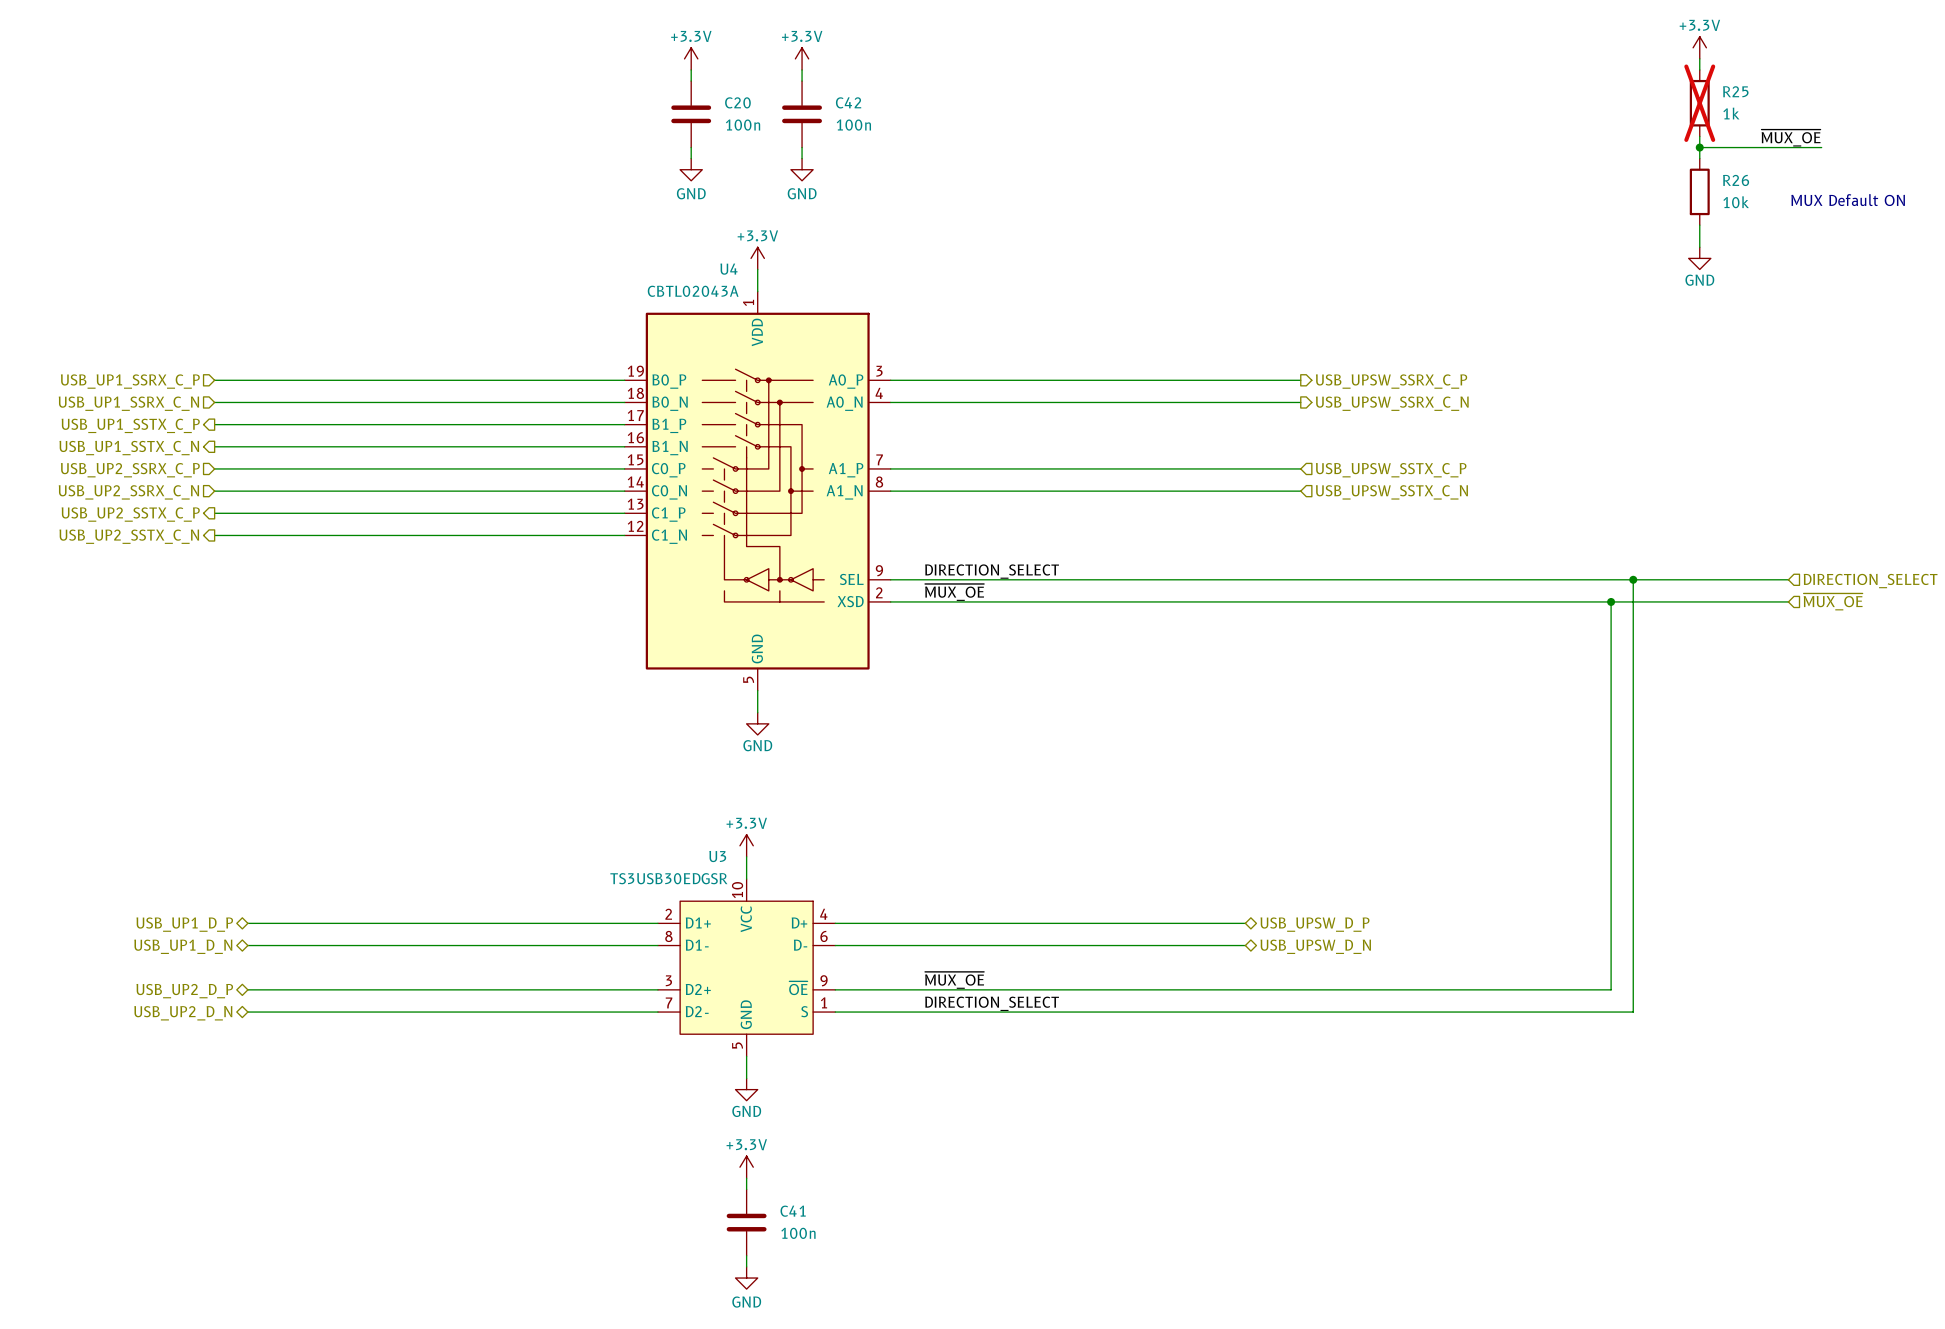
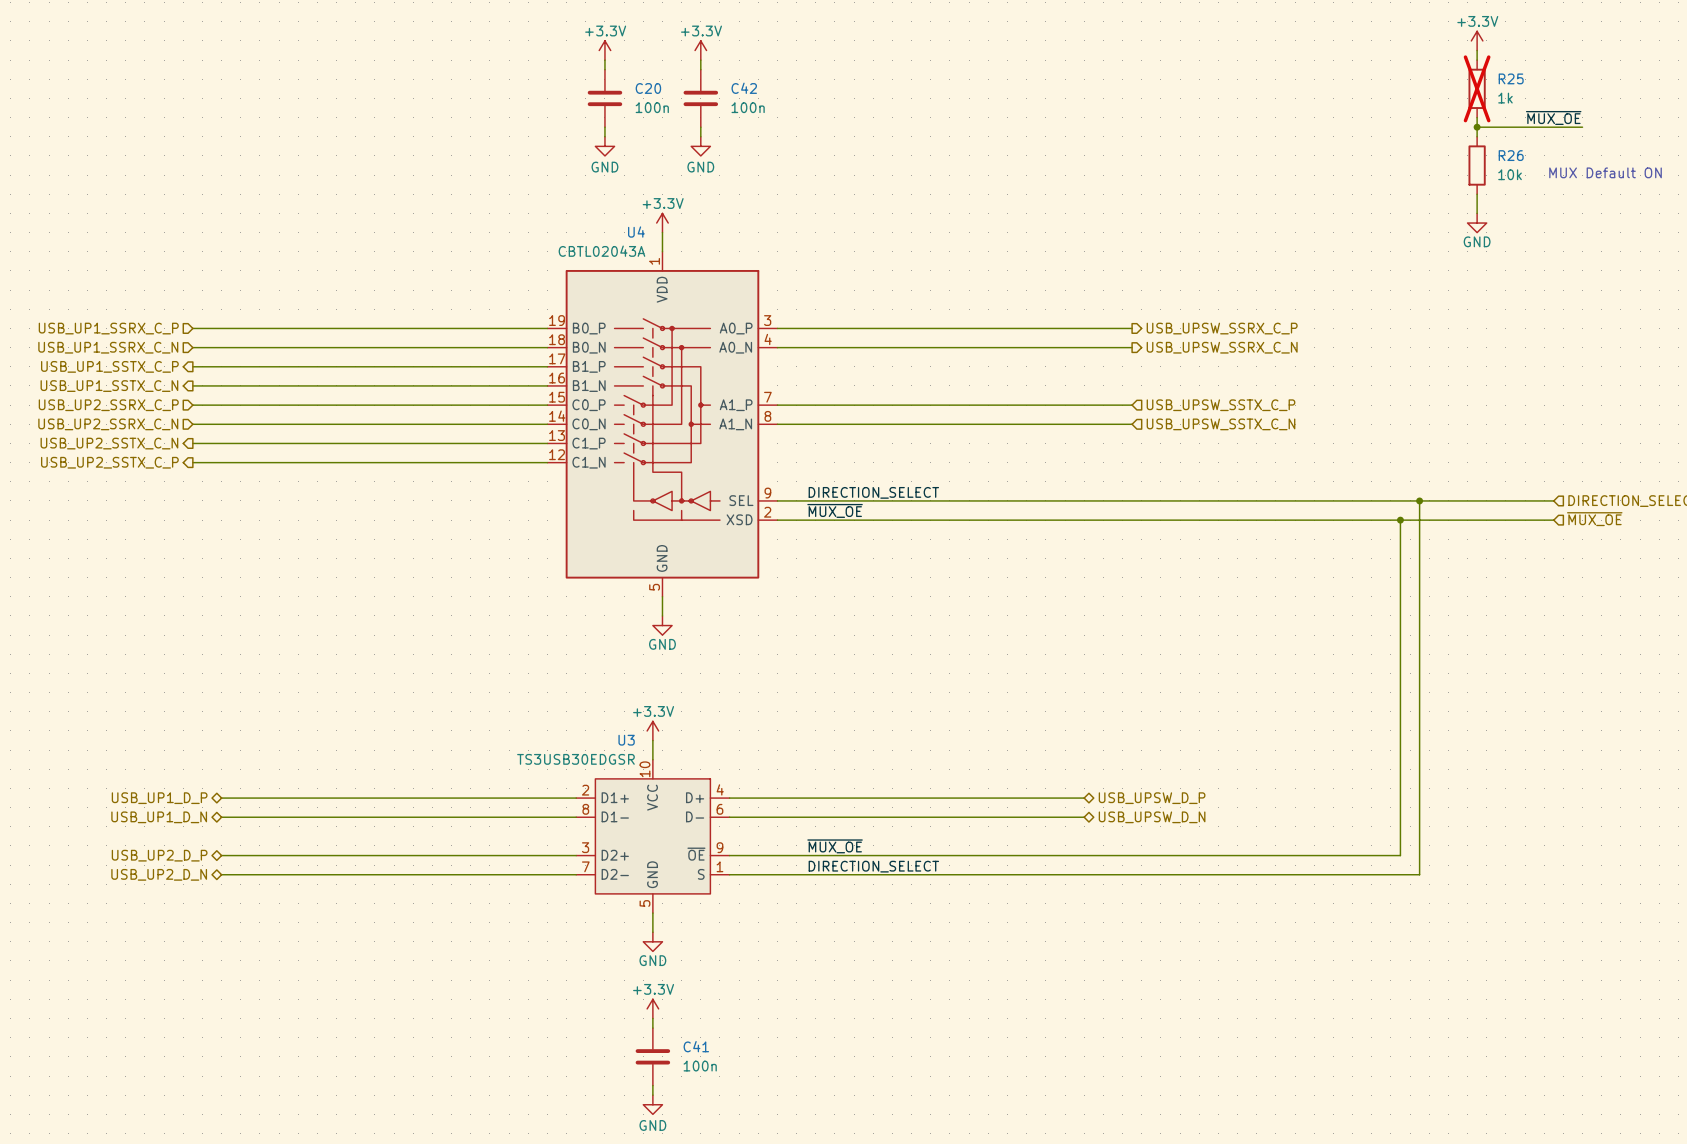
hierarchical label: USB_UP2_SSTX_C_P (130, 514) -> USB_UP2_SSTX_C_N (109, 443)
hierarchical label: USB_UP2_SSTX_C_N (129, 536) -> USB_UP2_SSTX_C_P (109, 462)

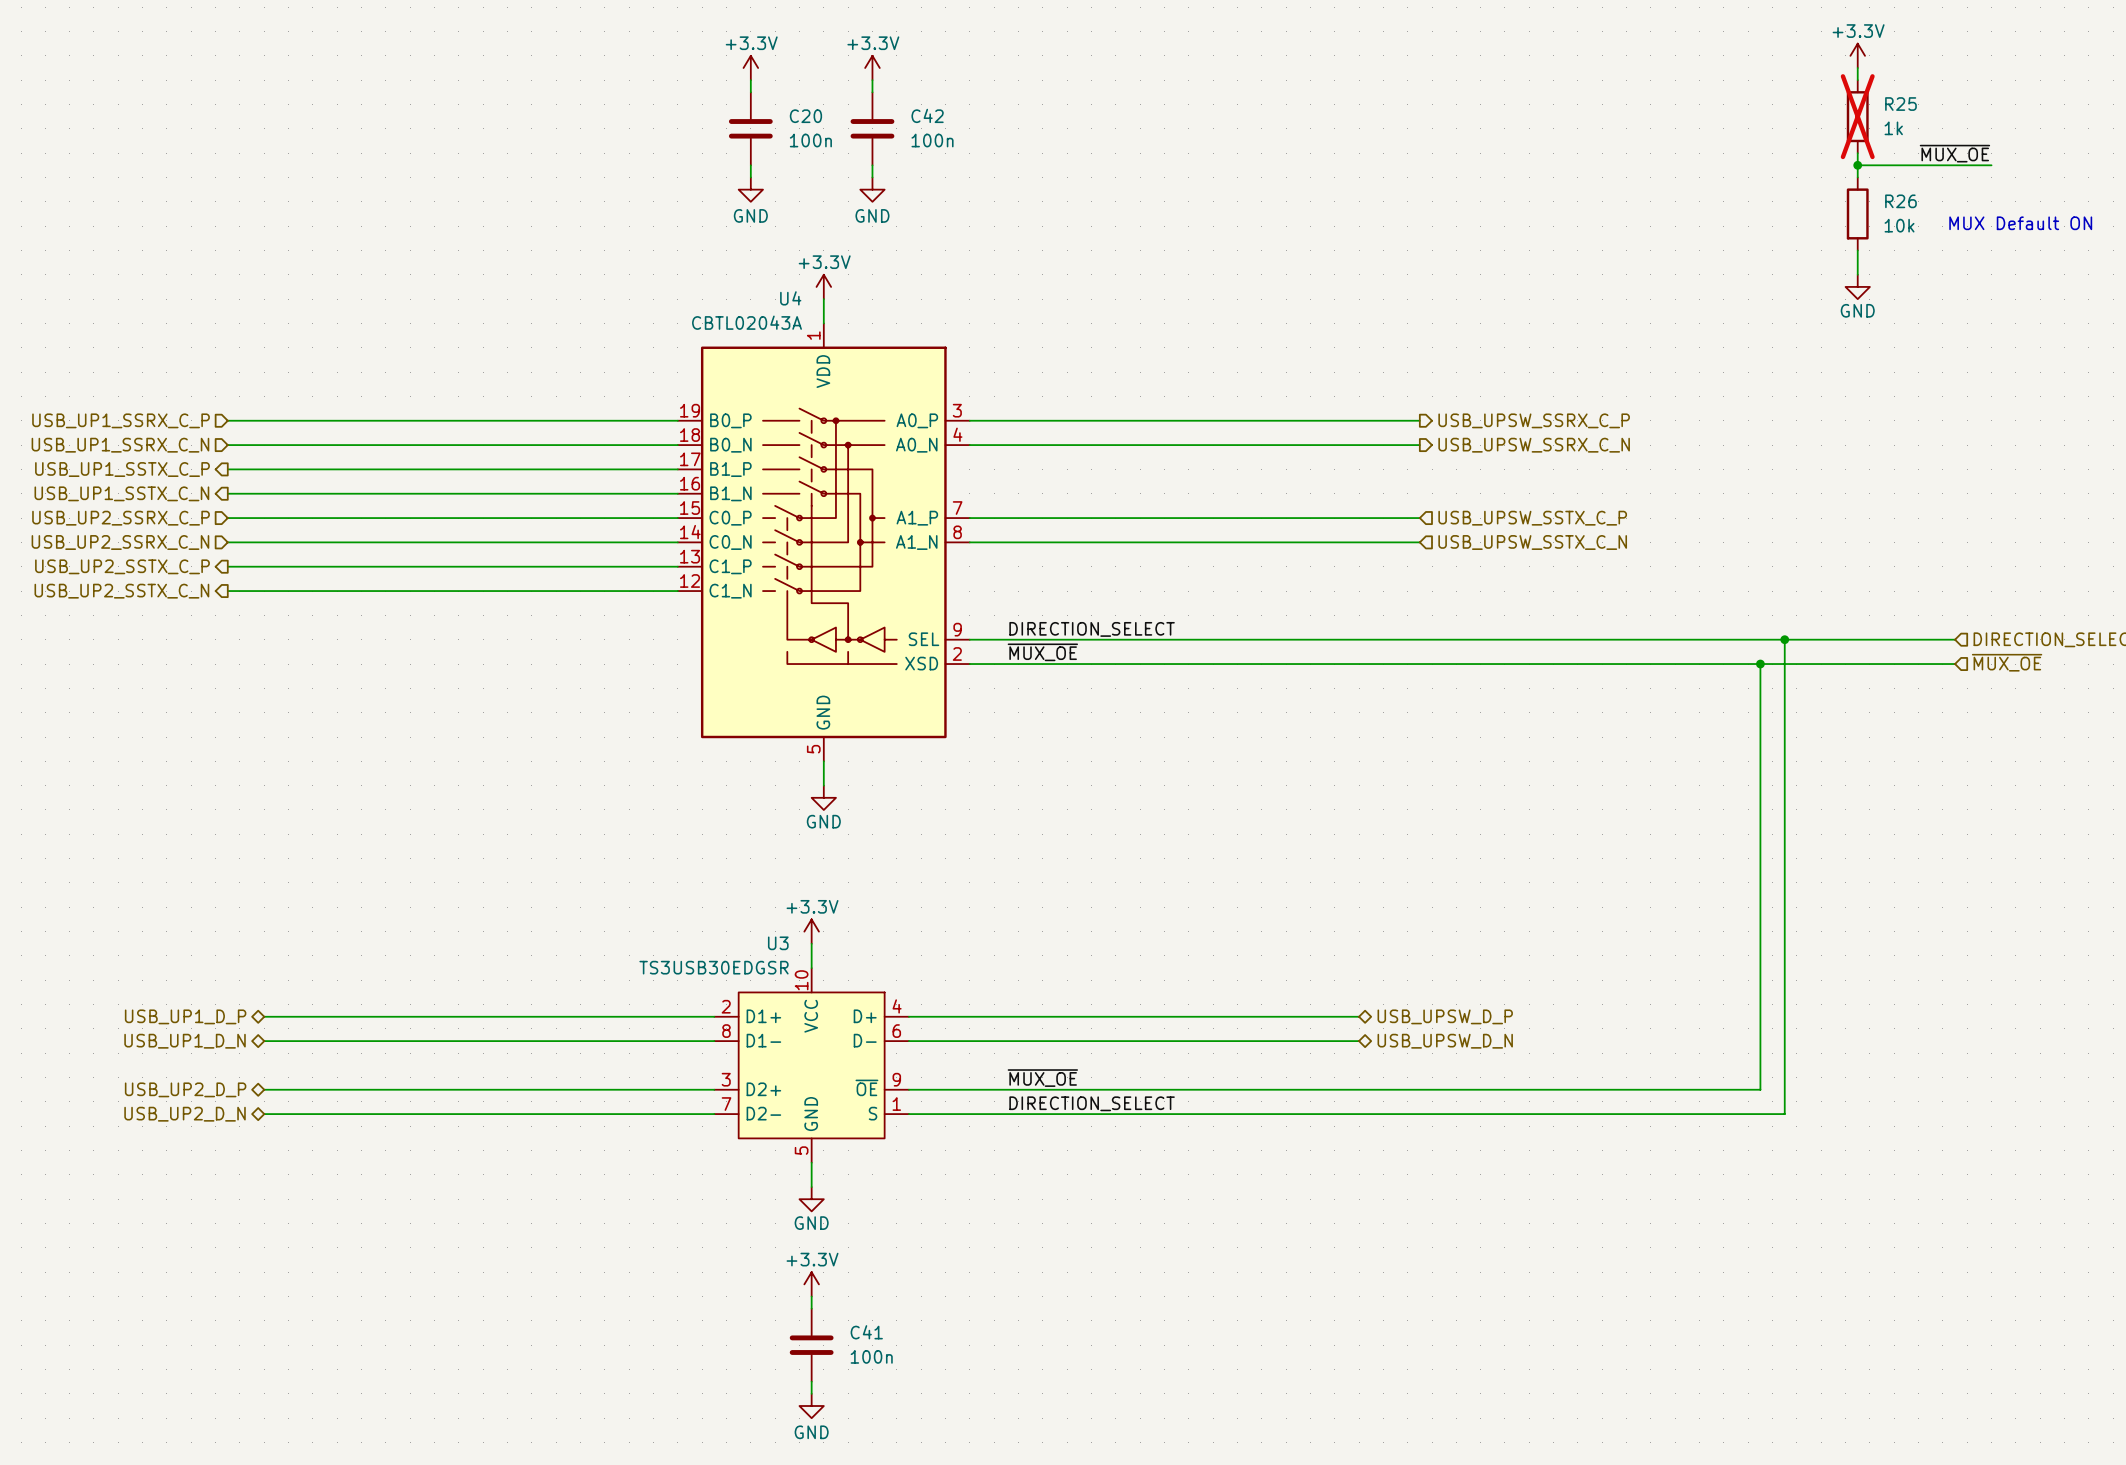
hierarchical label: USB_UP2_SSTX_C_N (109, 443) -> USB_UP2_SSTX_C_P (122, 566)
hierarchical label: USB_UP2_SSTX_C_P (109, 462) -> USB_UP2_SSTX_C_N (121, 591)

